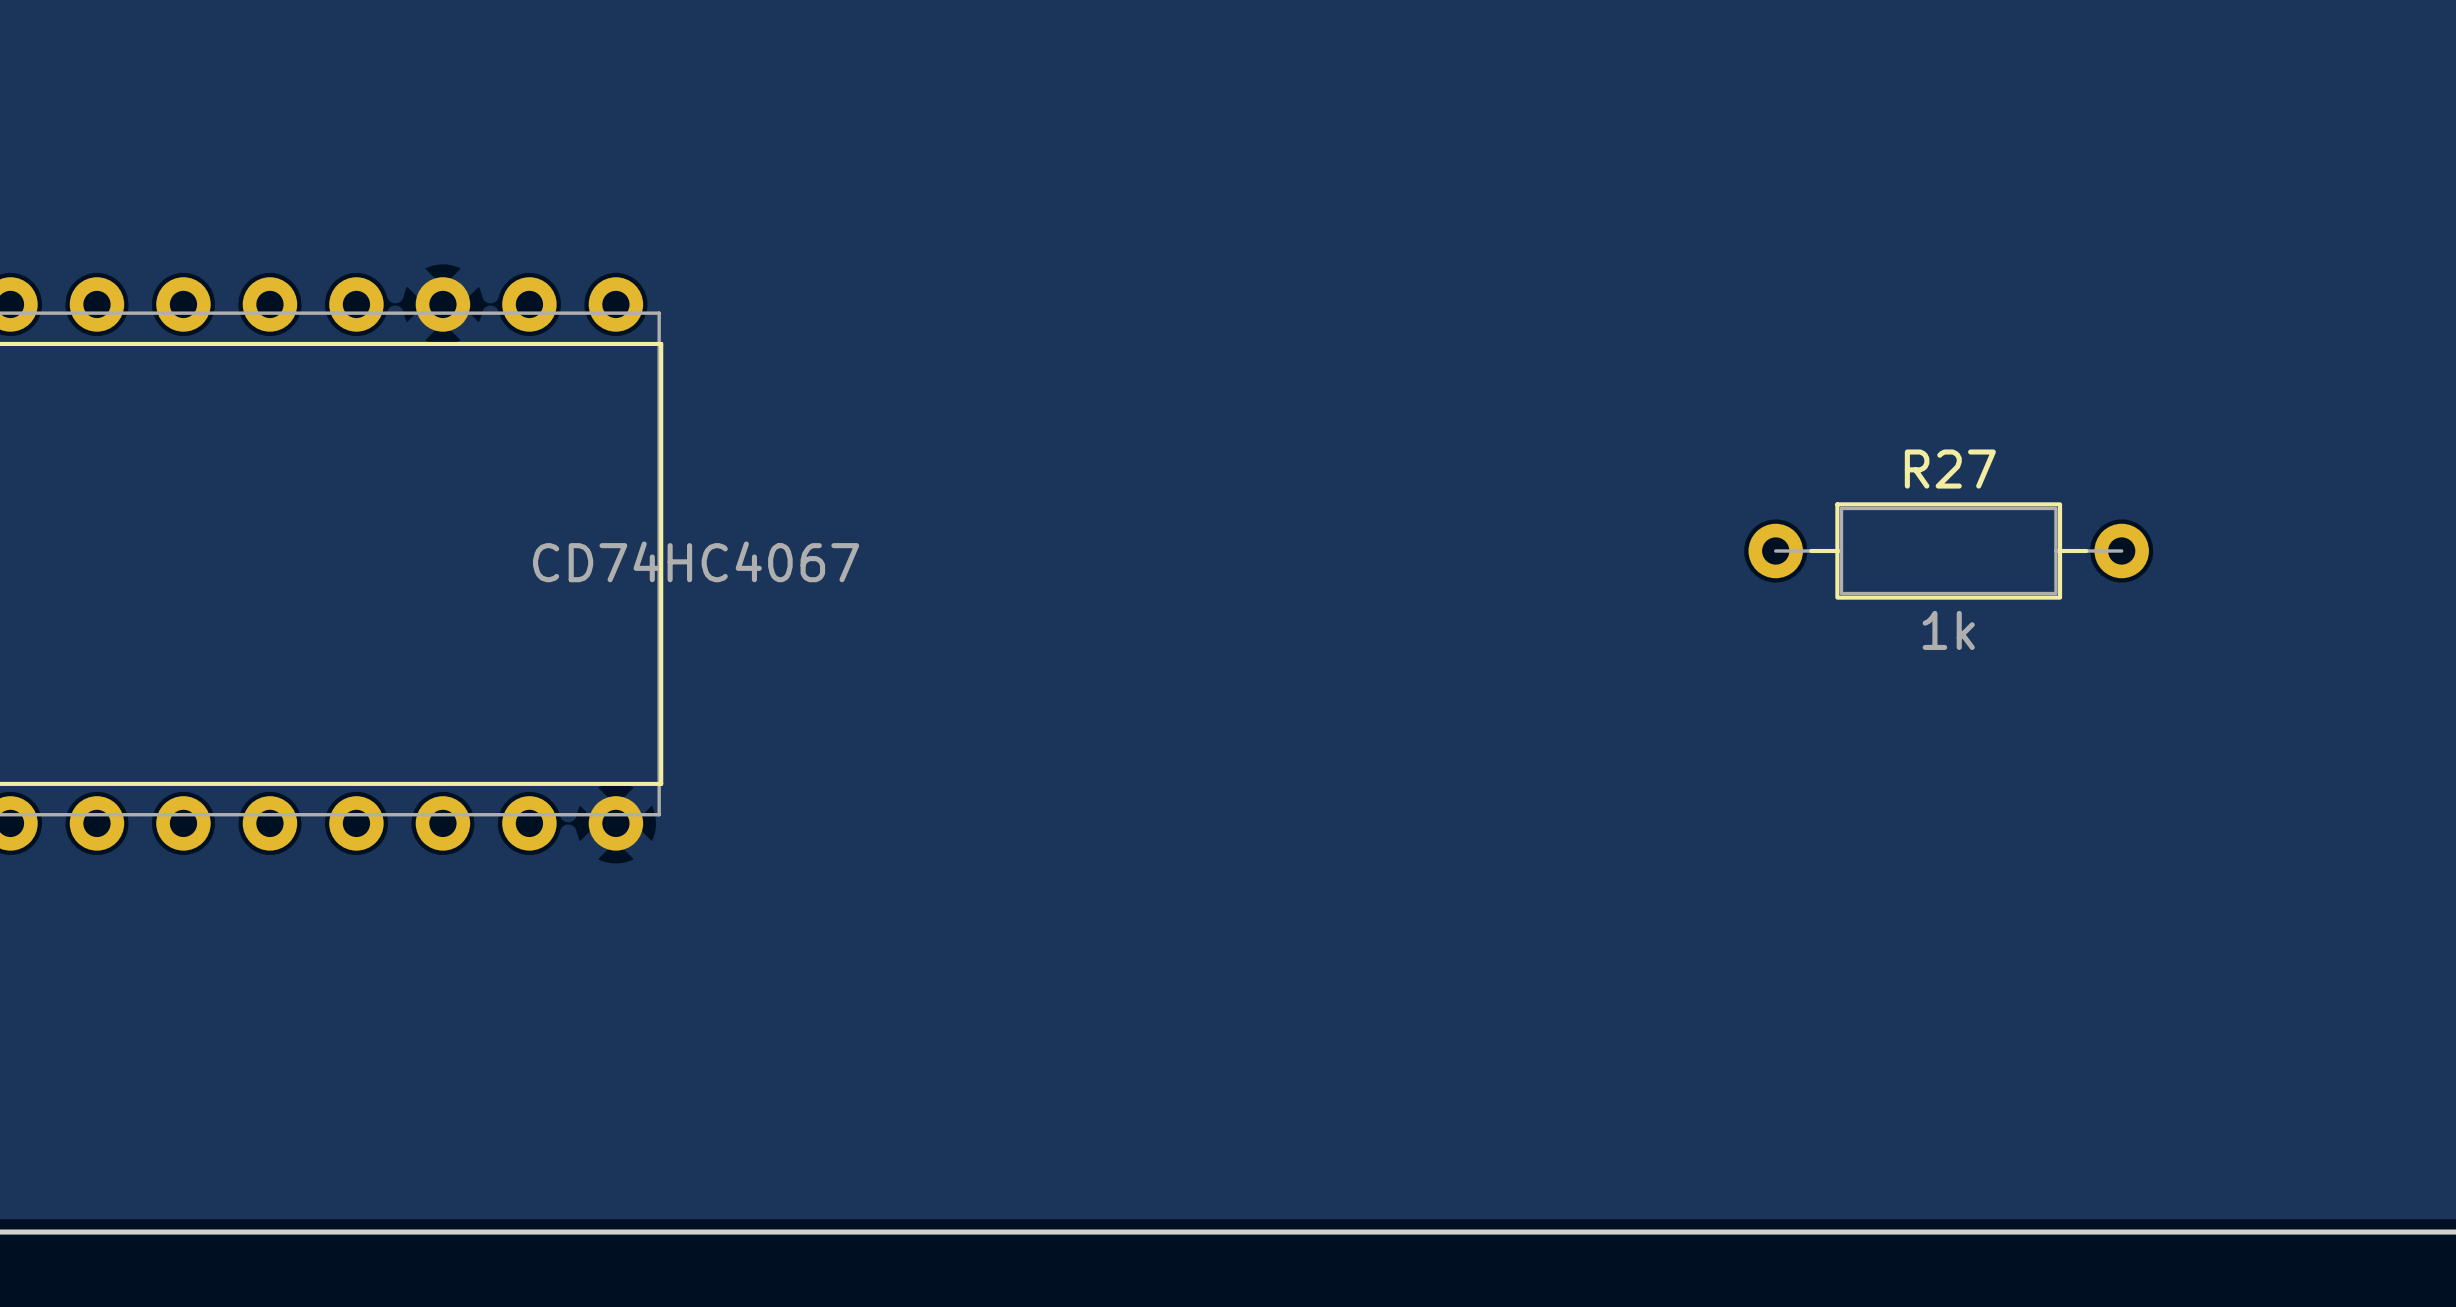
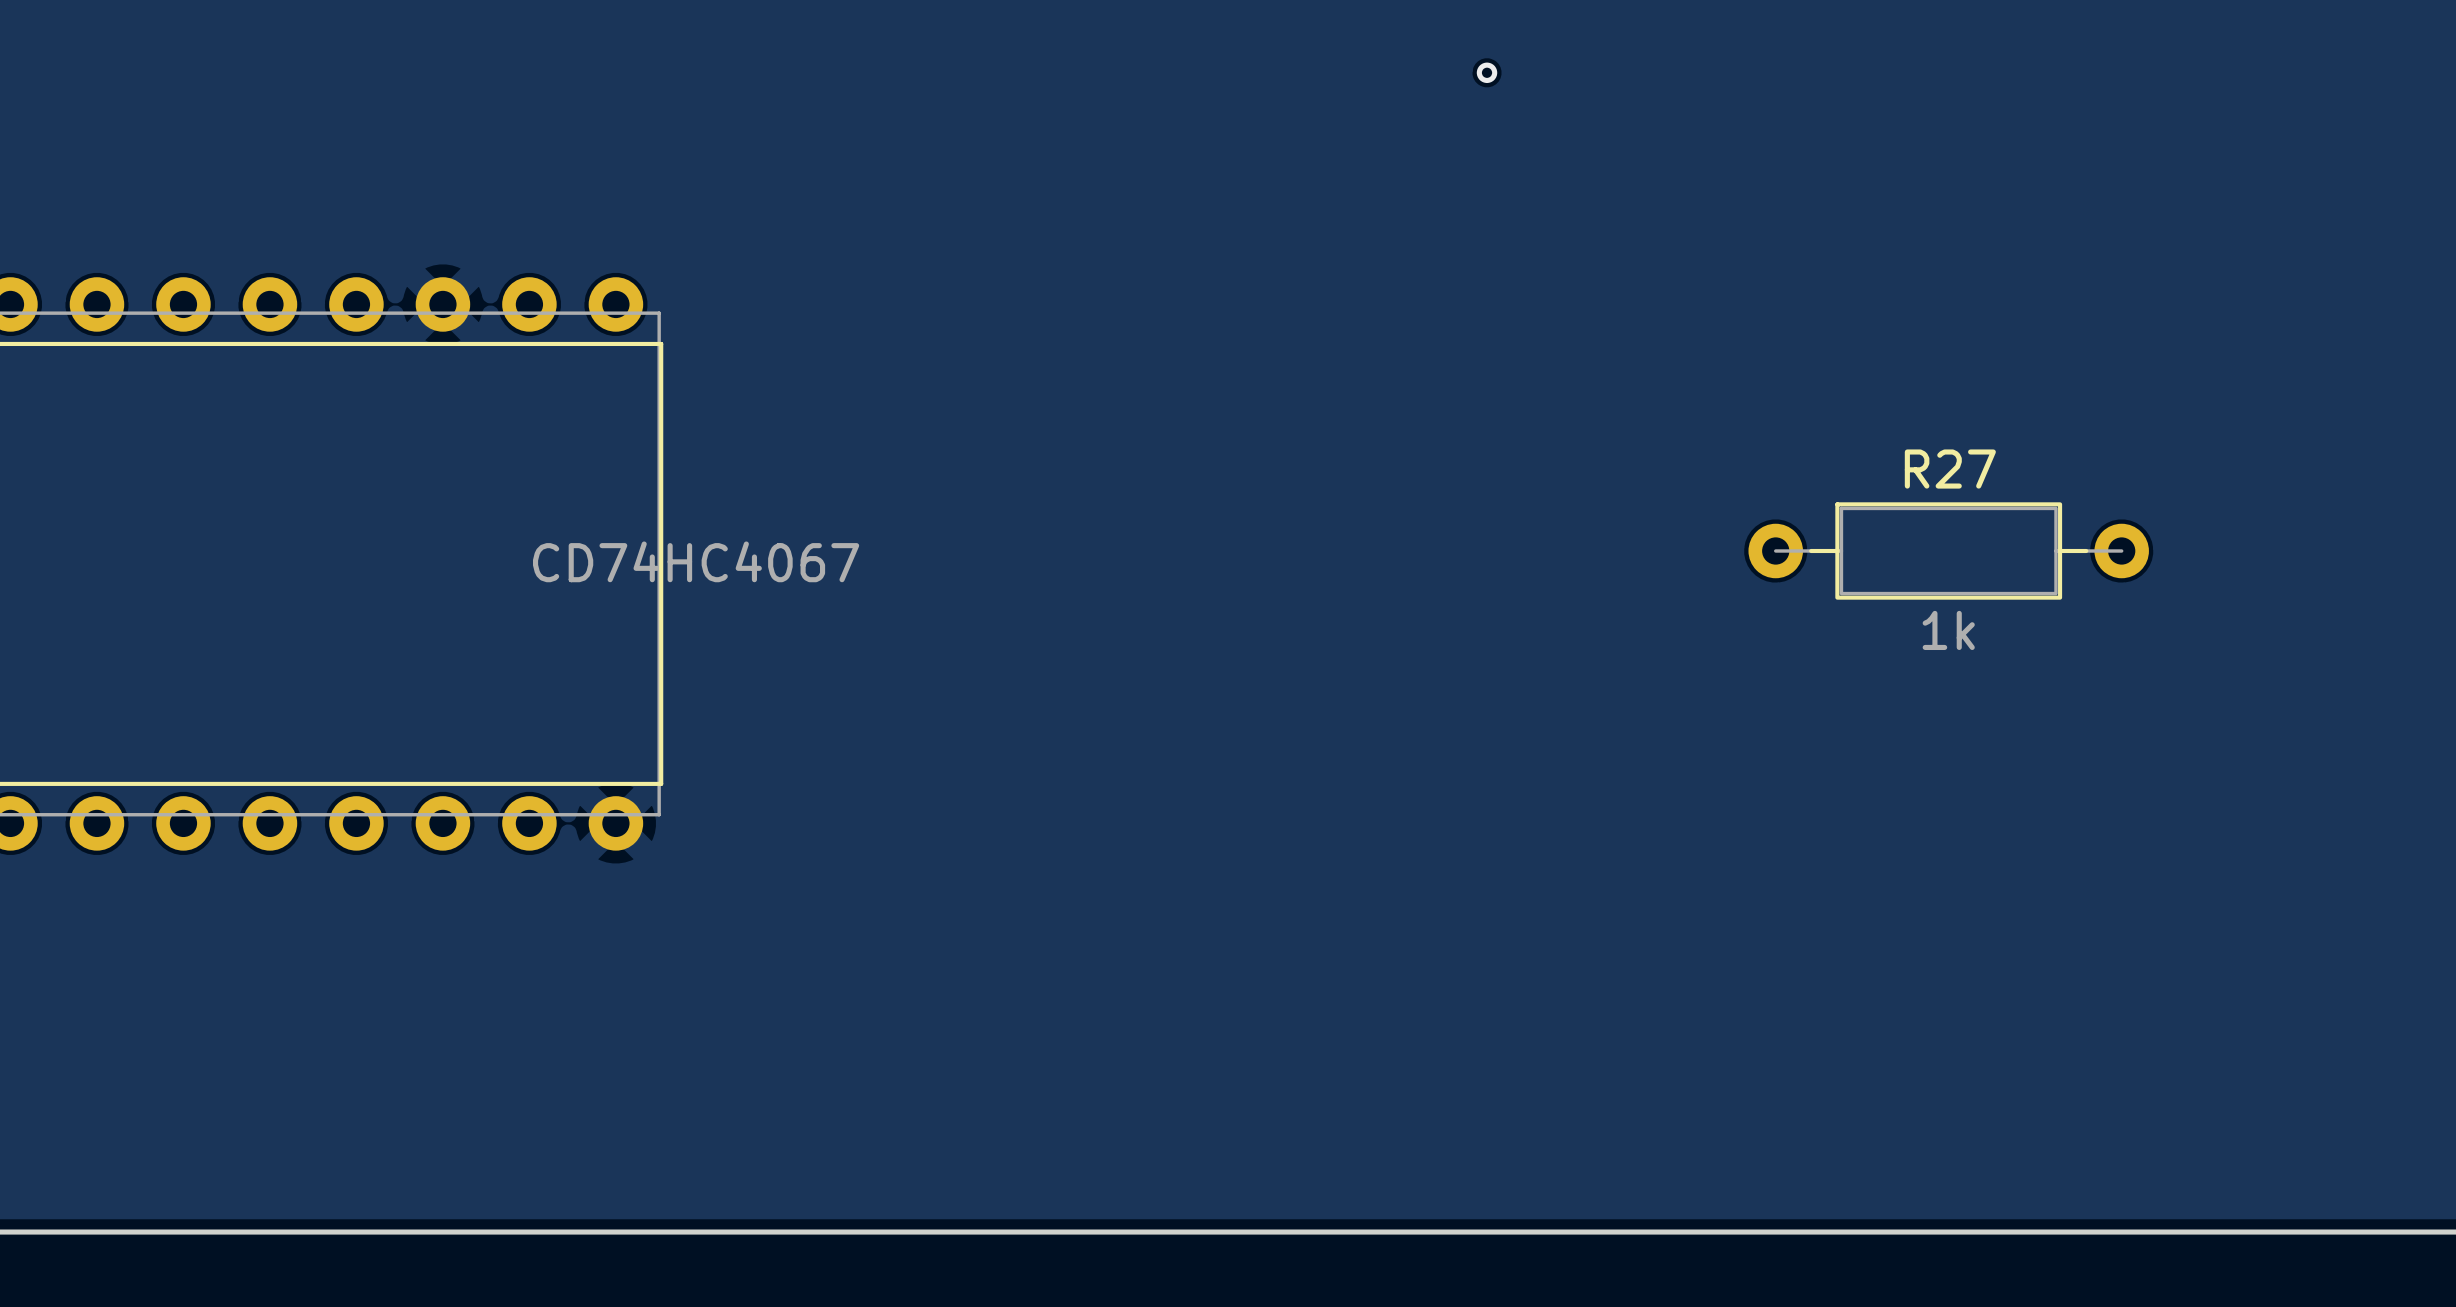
via: none -> (1487, 72)

